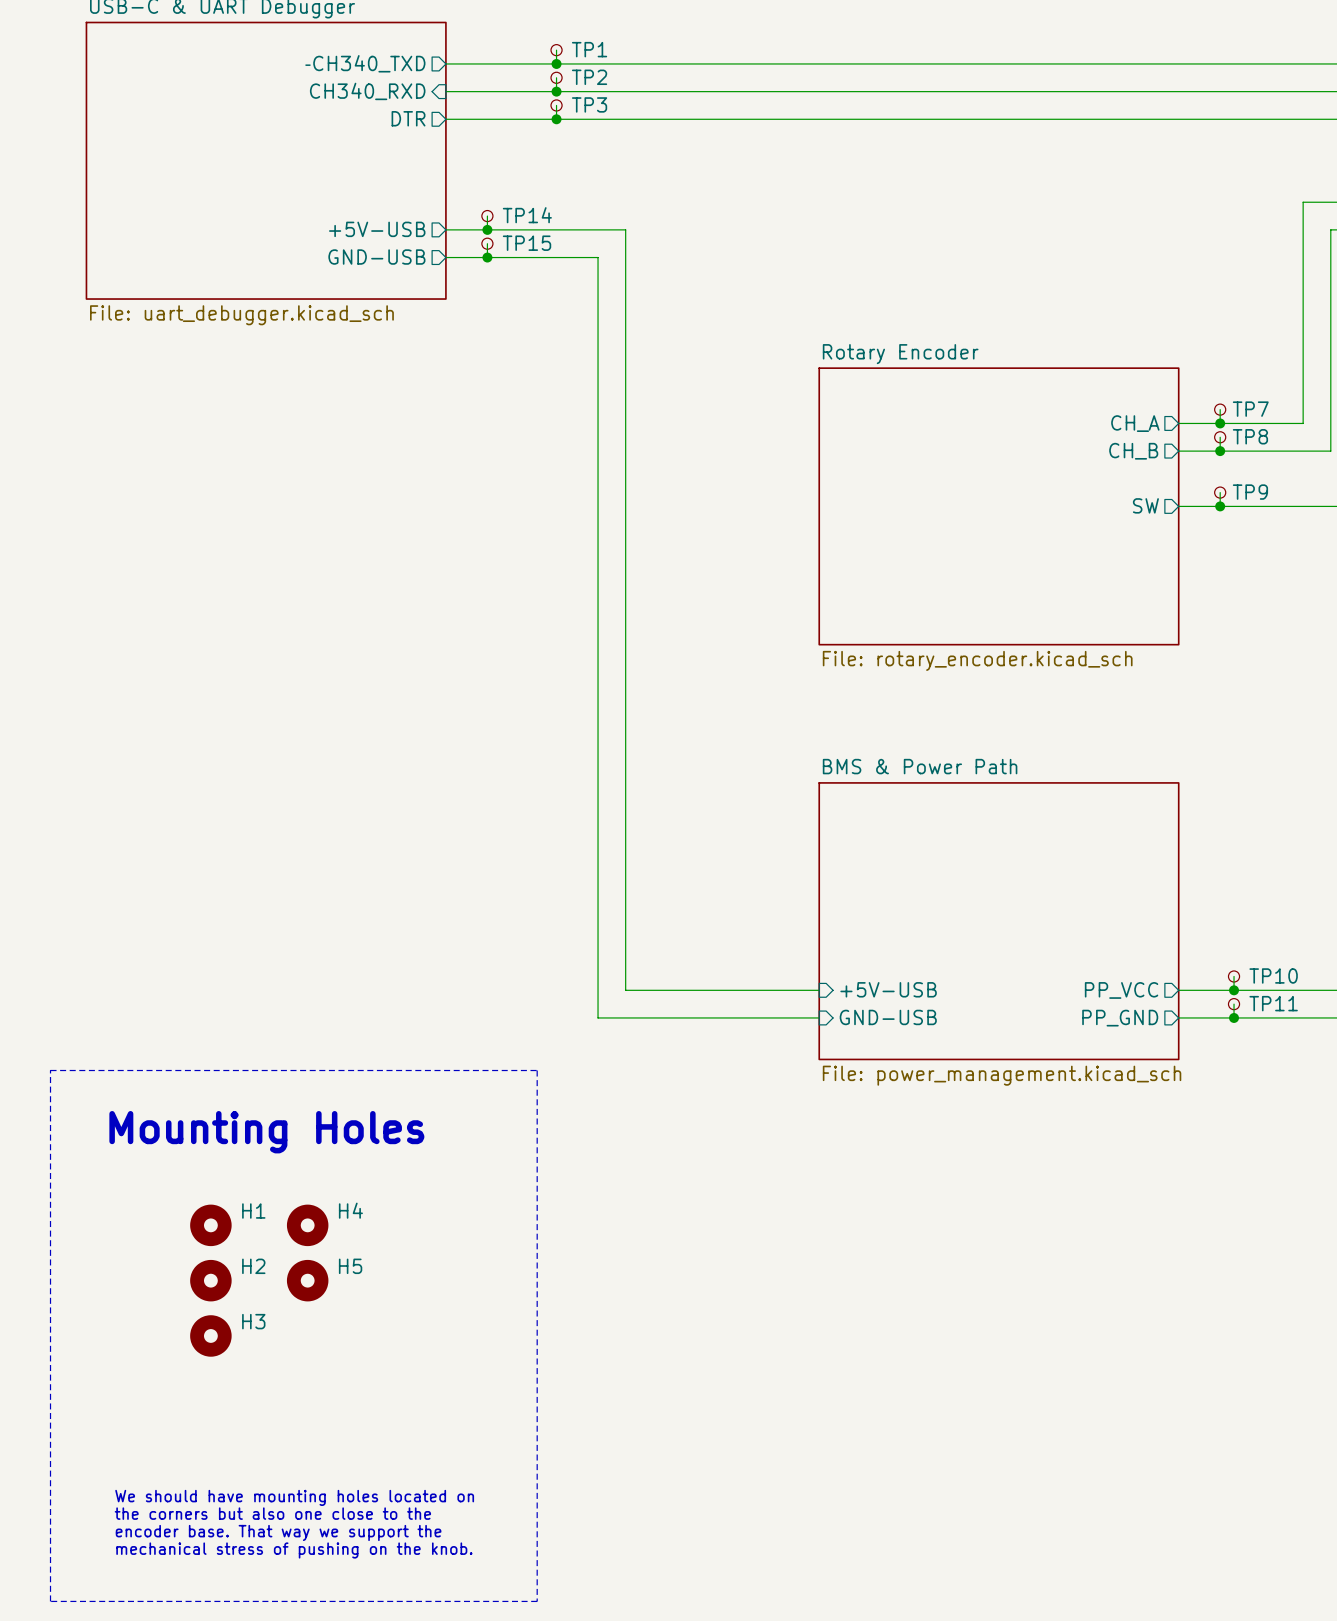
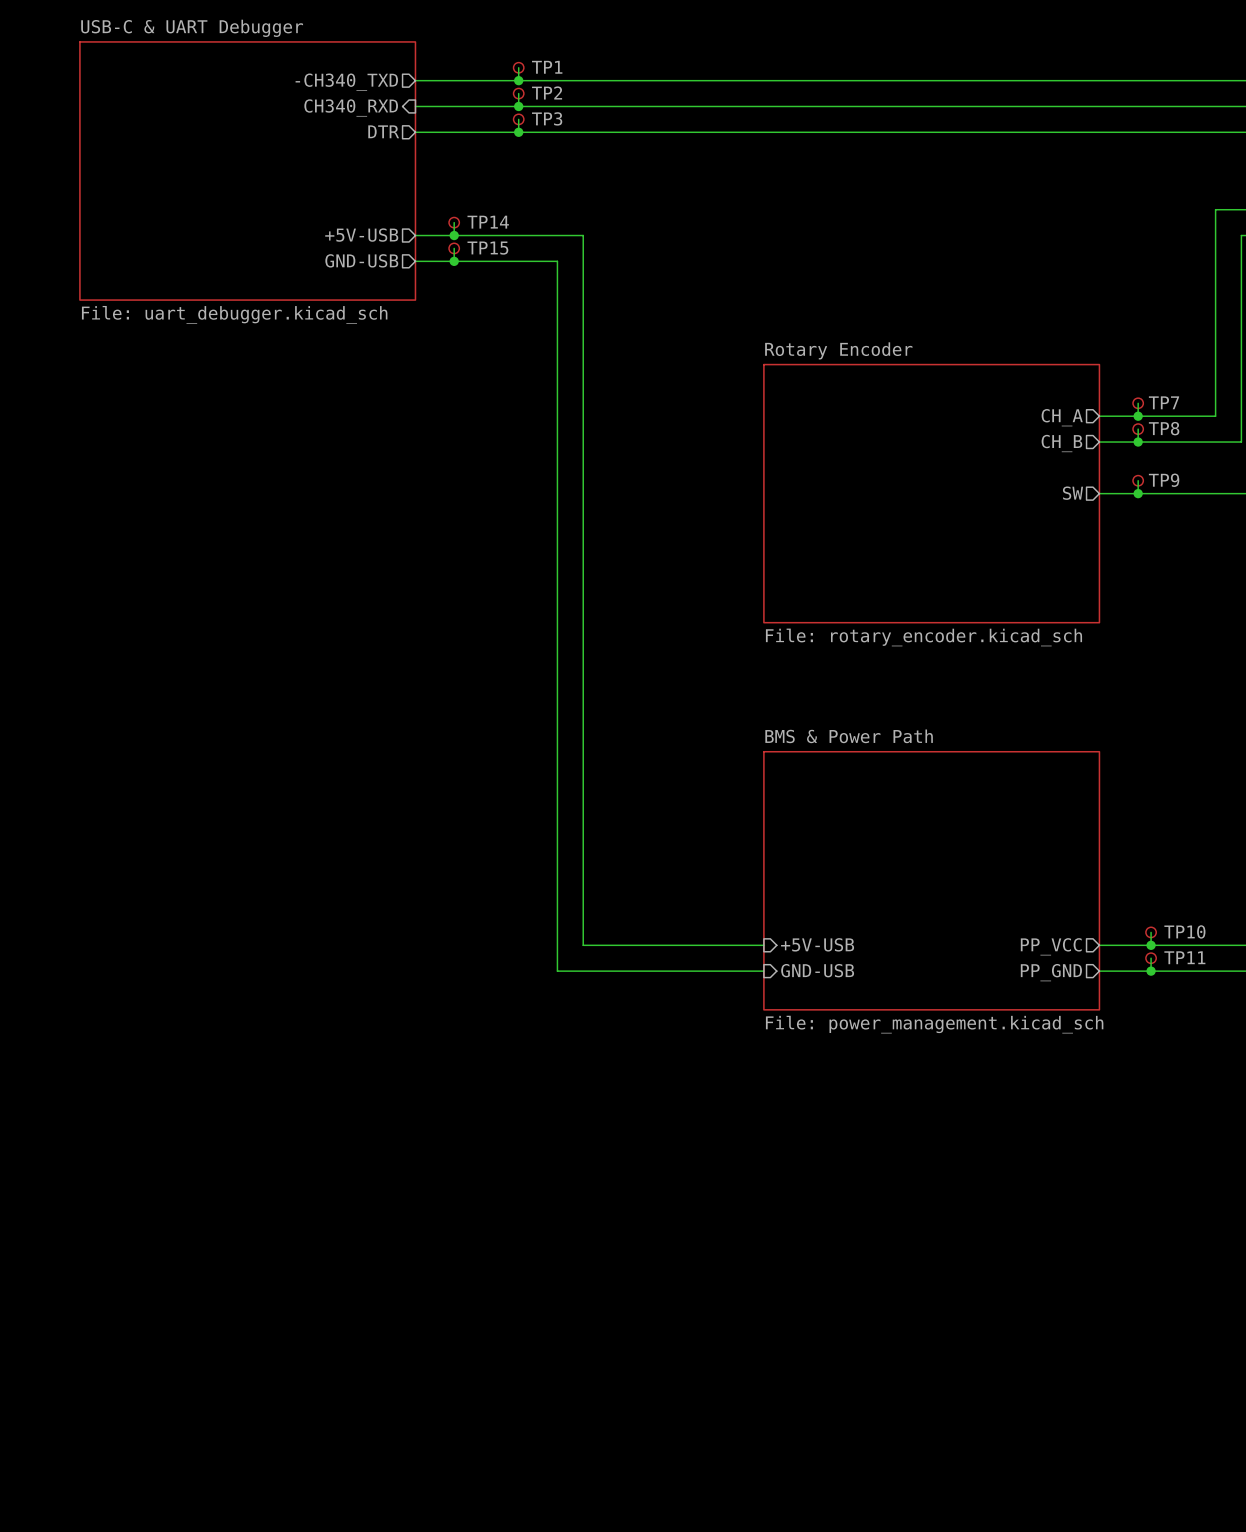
line: (50, 1070) (537, 1070) (537, 1601) (50, 1601) (50, 1070) -> none
text: Mounting Holes (266, 1132) -> none
H1: (210, 1225) -> none
H4: (307, 1225) -> none
H2: (210, 1280) -> none
H5: (307, 1280) -> none
H3: (210, 1335) -> none
text: We should have mounting holes located on (294, 1497) -> none
text: the corners but also one close to the (272, 1513) -> none
text: encoder base. That way we support the (278, 1532) -> none
text: mechanical stress of pushing on the knob. (294, 1550) -> none

